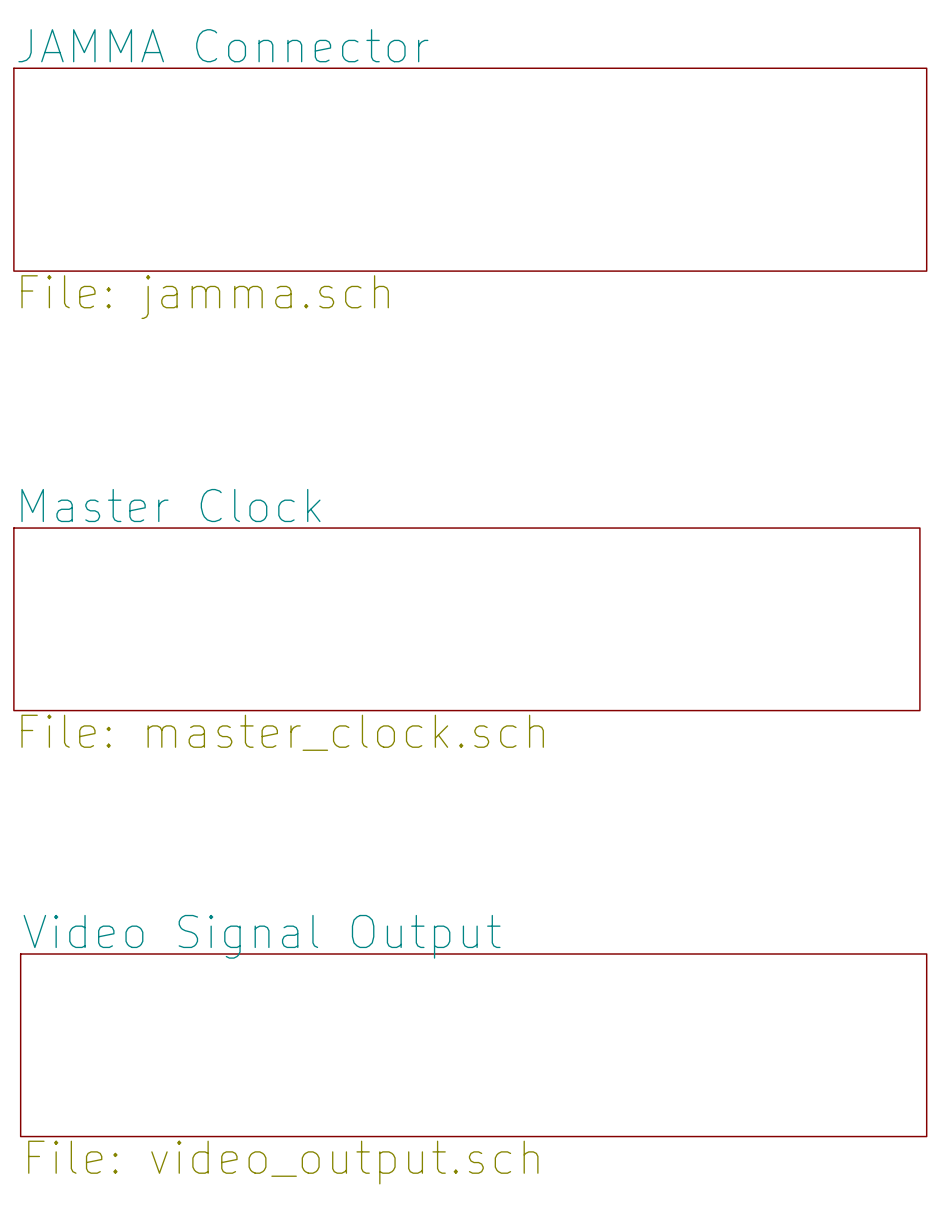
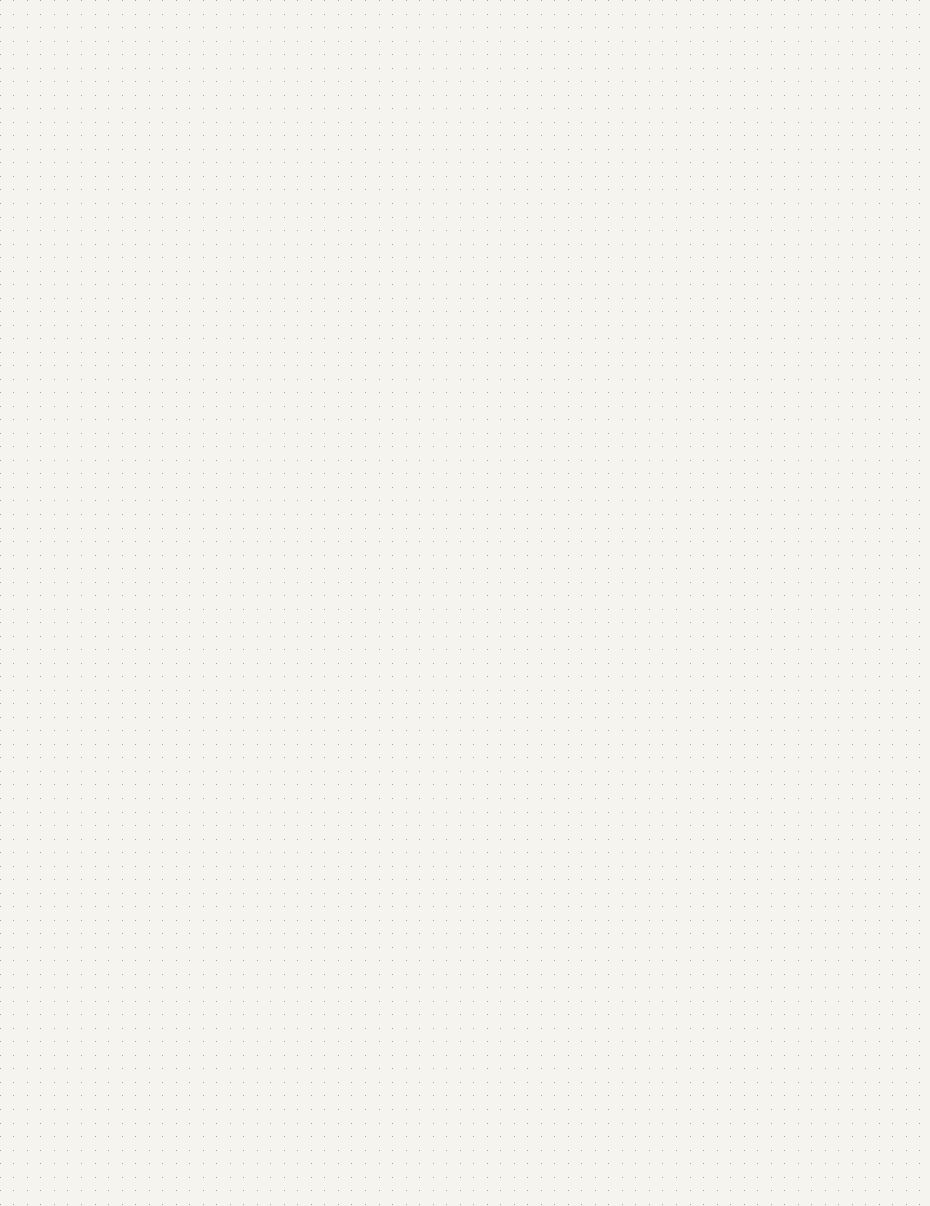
sheet JAMMA Connector: File: jamma.sch (470, 169) -> none
sheet Master Clock: File: master_clock.sch (466, 619) -> none
sheet Video Signal Output: File: video_output.sch (473, 1045) -> none

